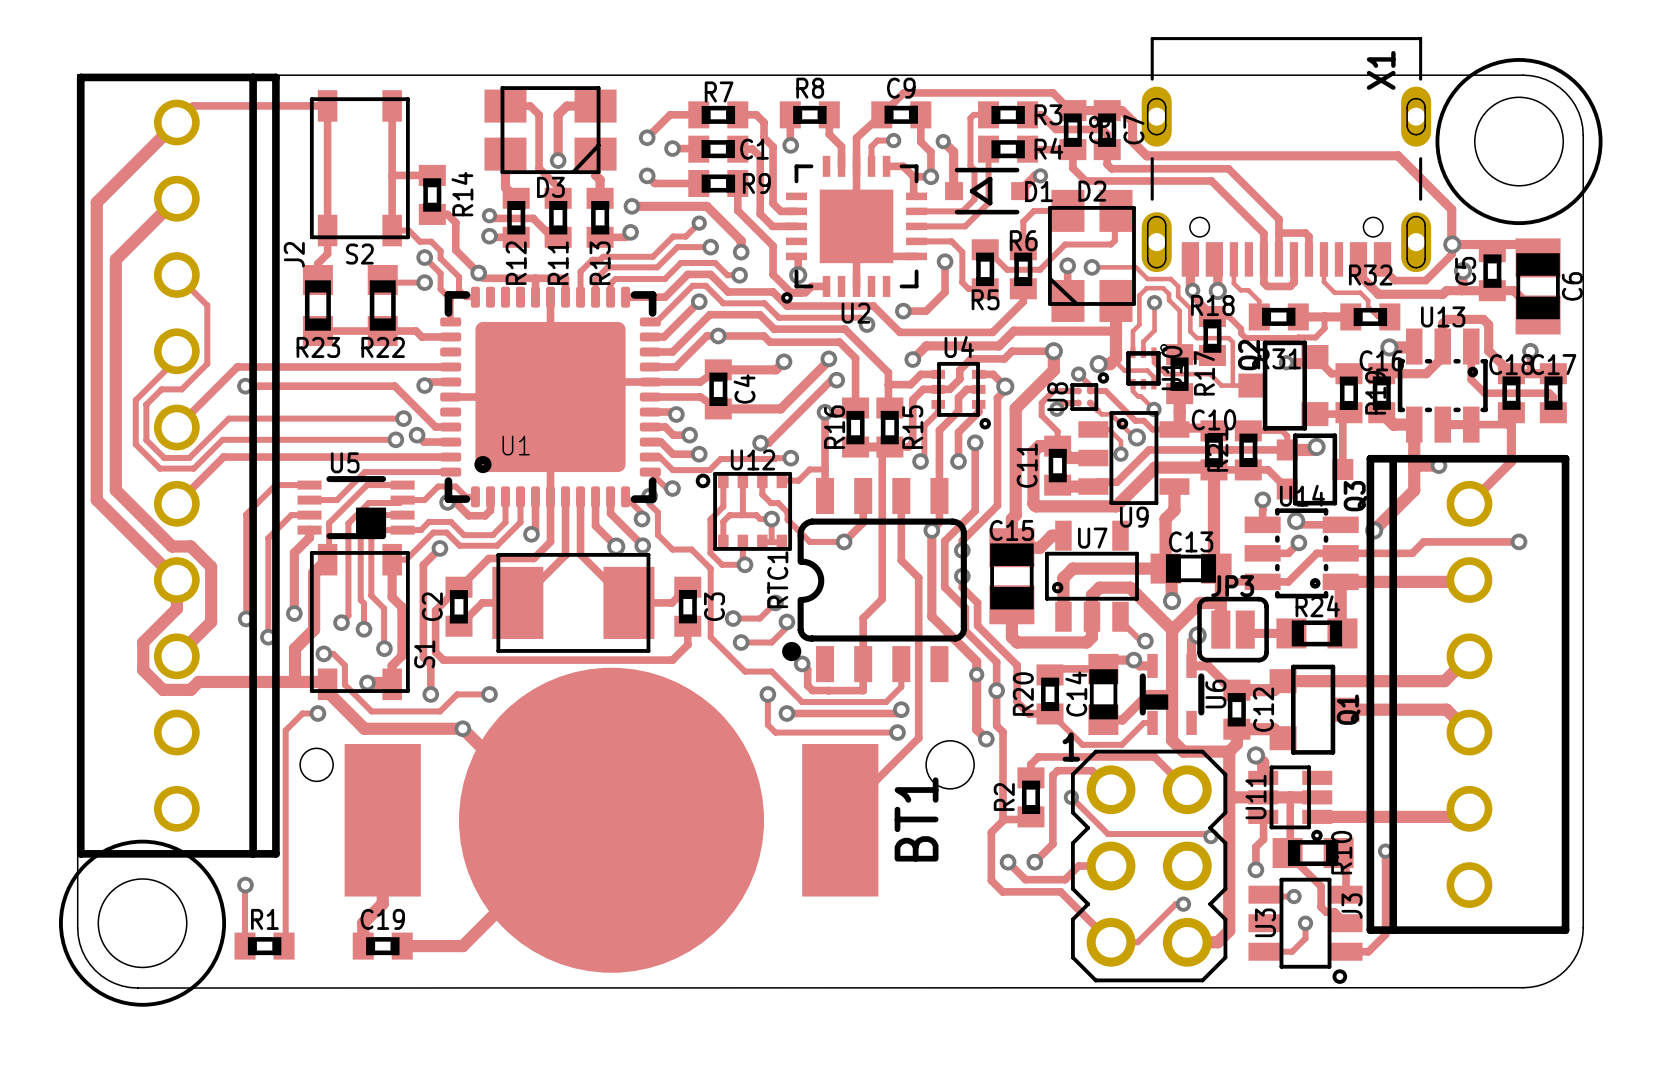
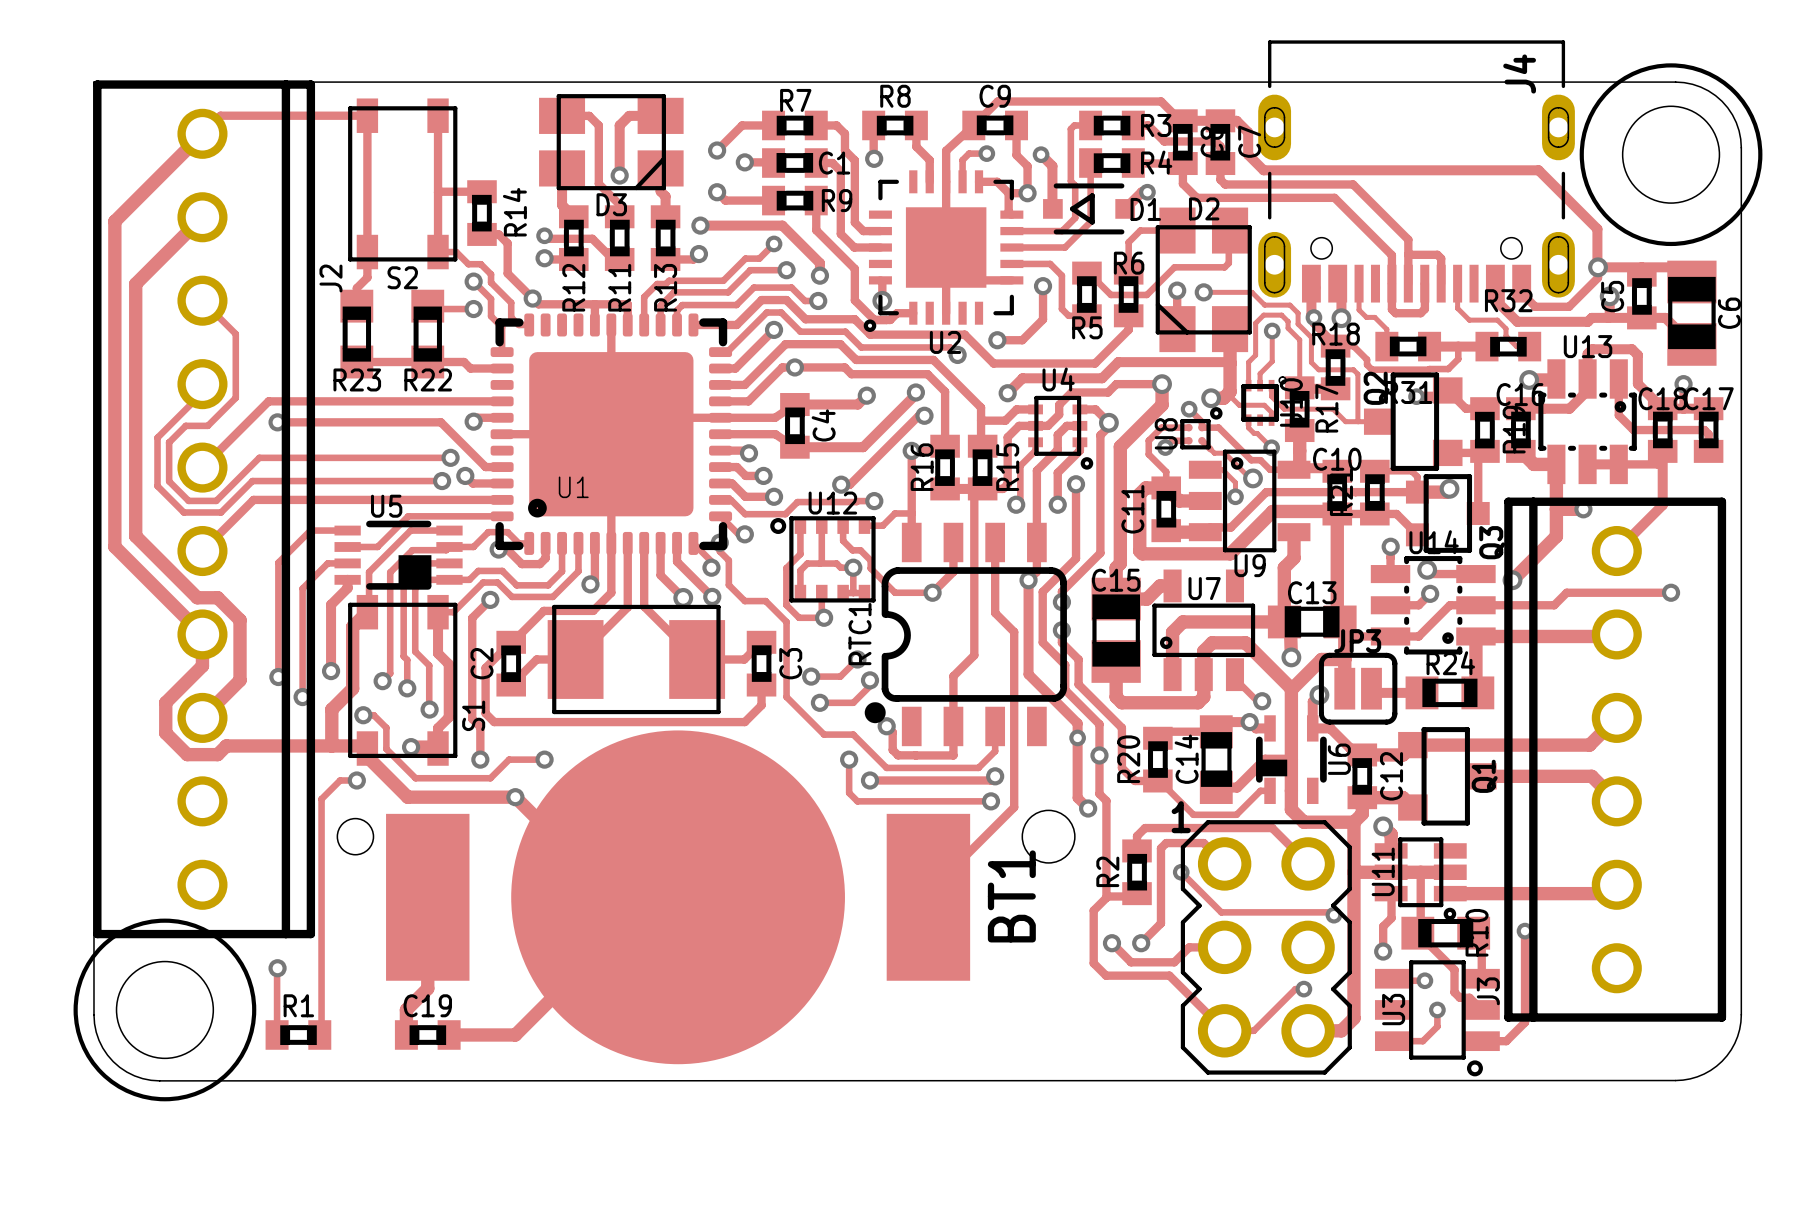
X1 name: X1 (1381, 70) -> J4 (1519, 74)

